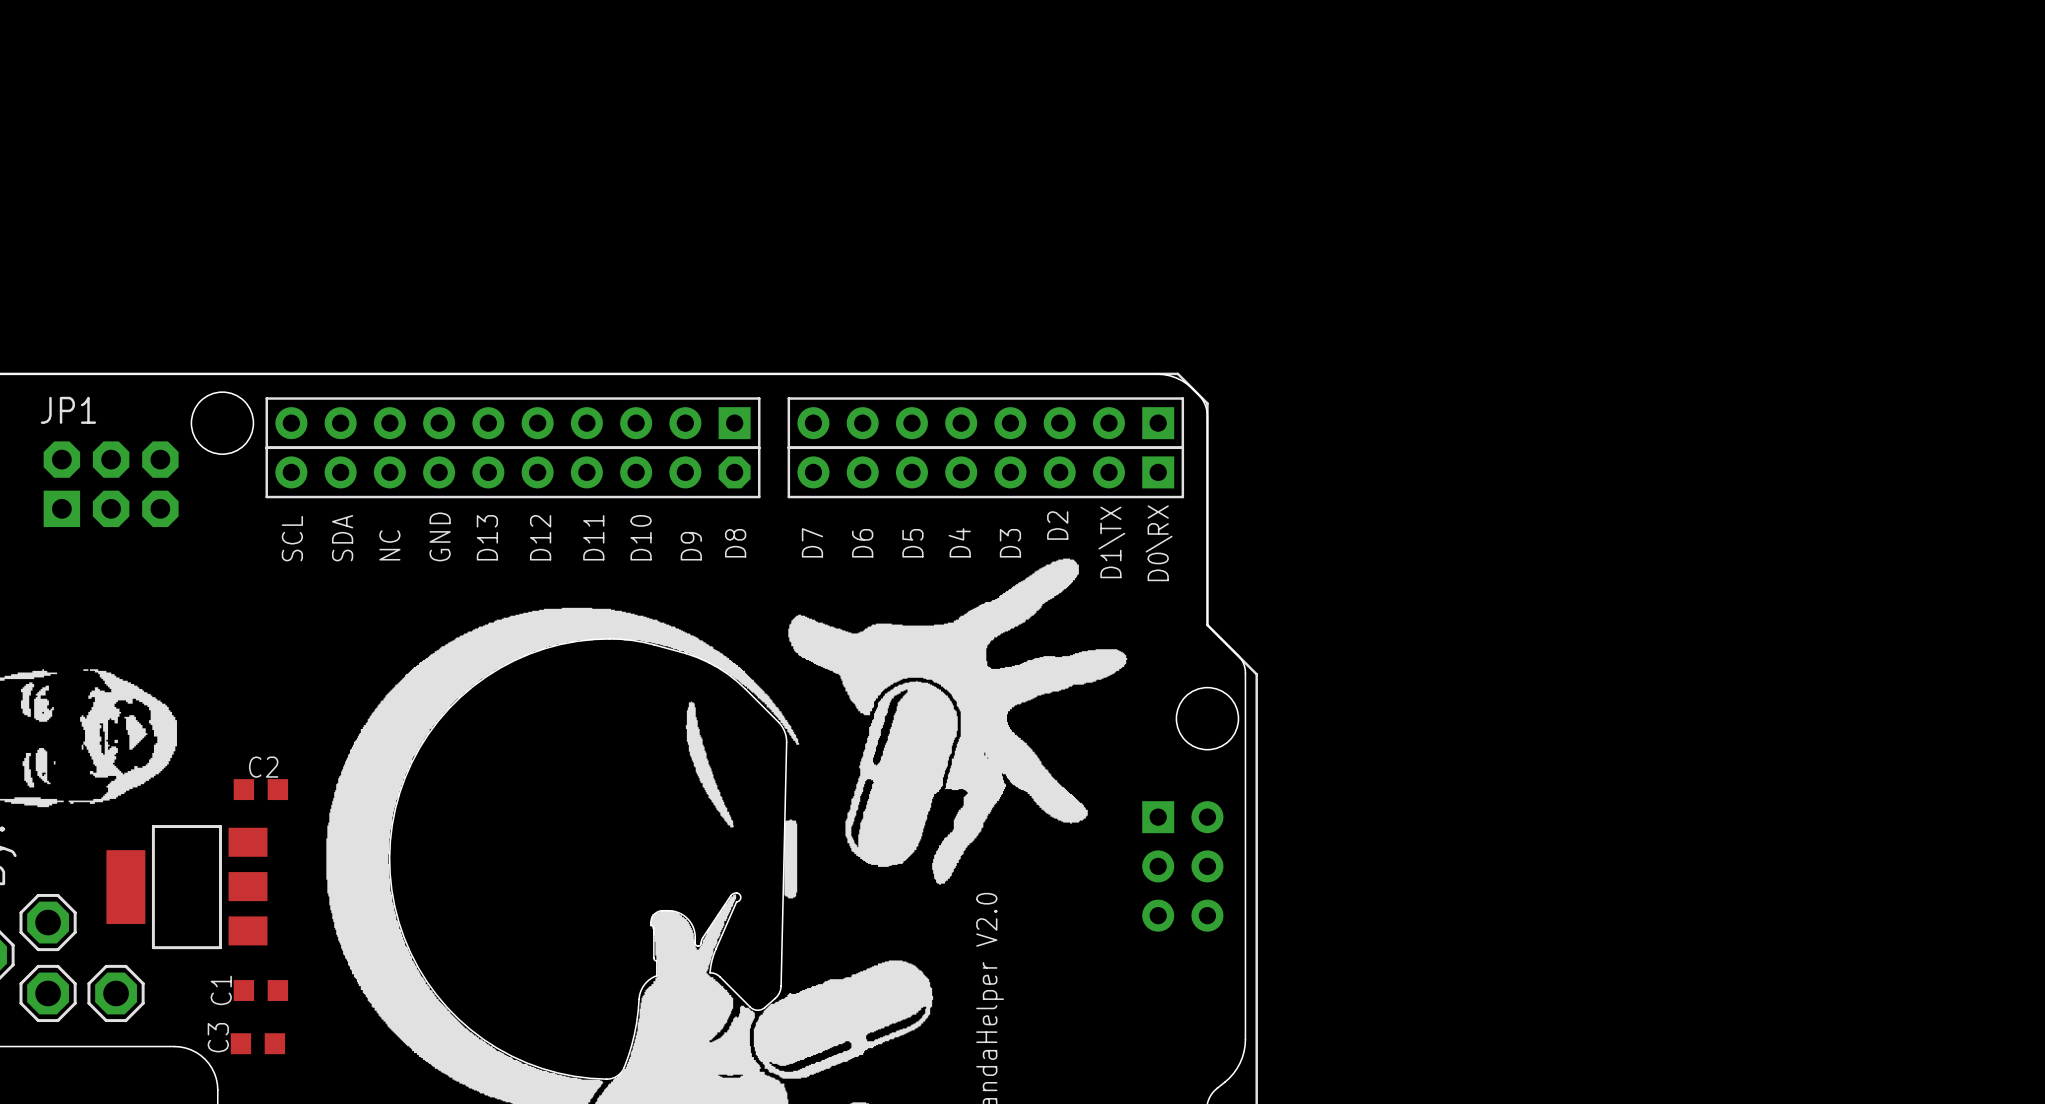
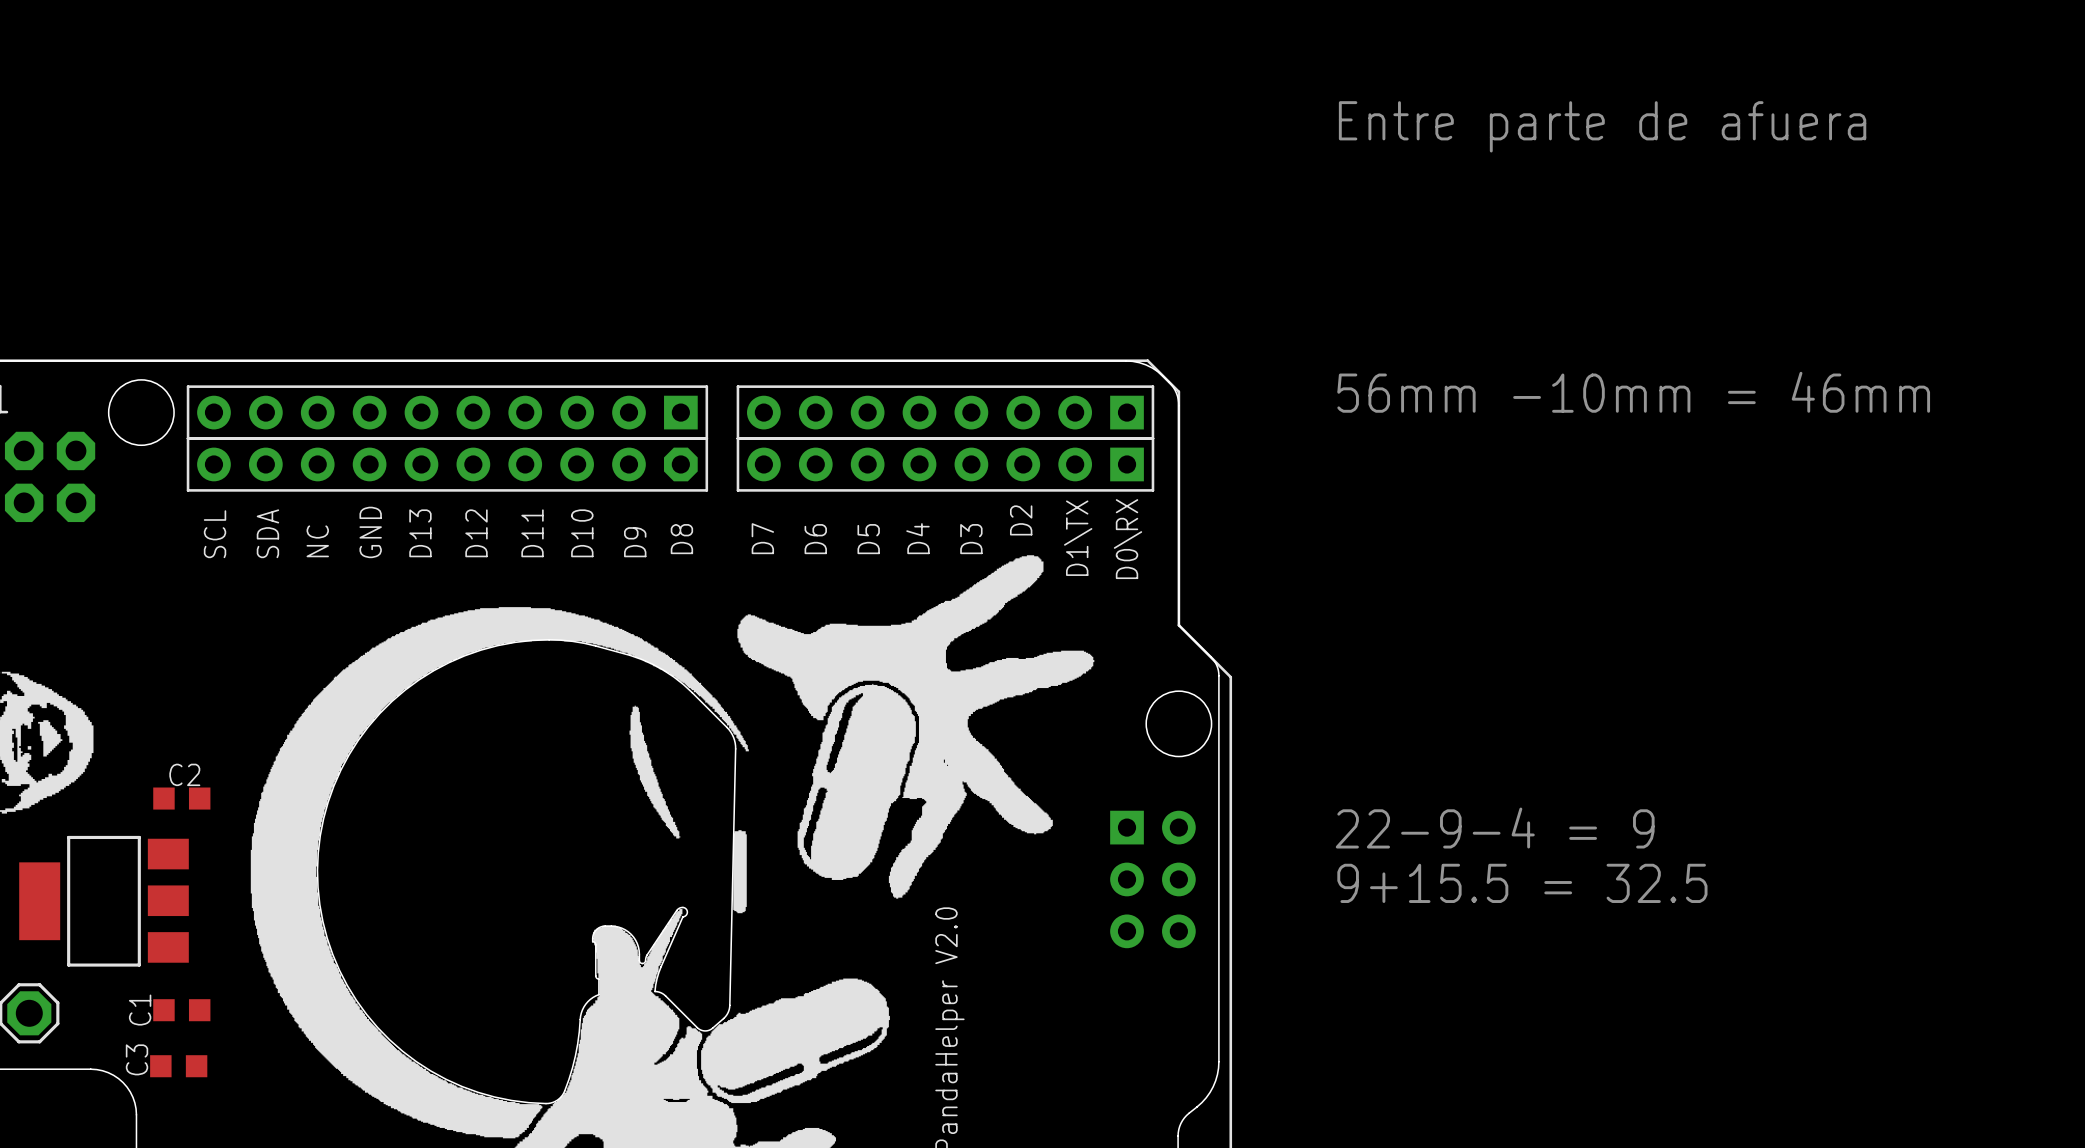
text: none -> Entre parte de afuera (1602, 126)
text: none -> 56mm -10mm = 46mm (1633, 392)
text: none -> 22-9-4 = 9 (1495, 828)
text: none -> 9+15.5 = 32.5 (1522, 883)

